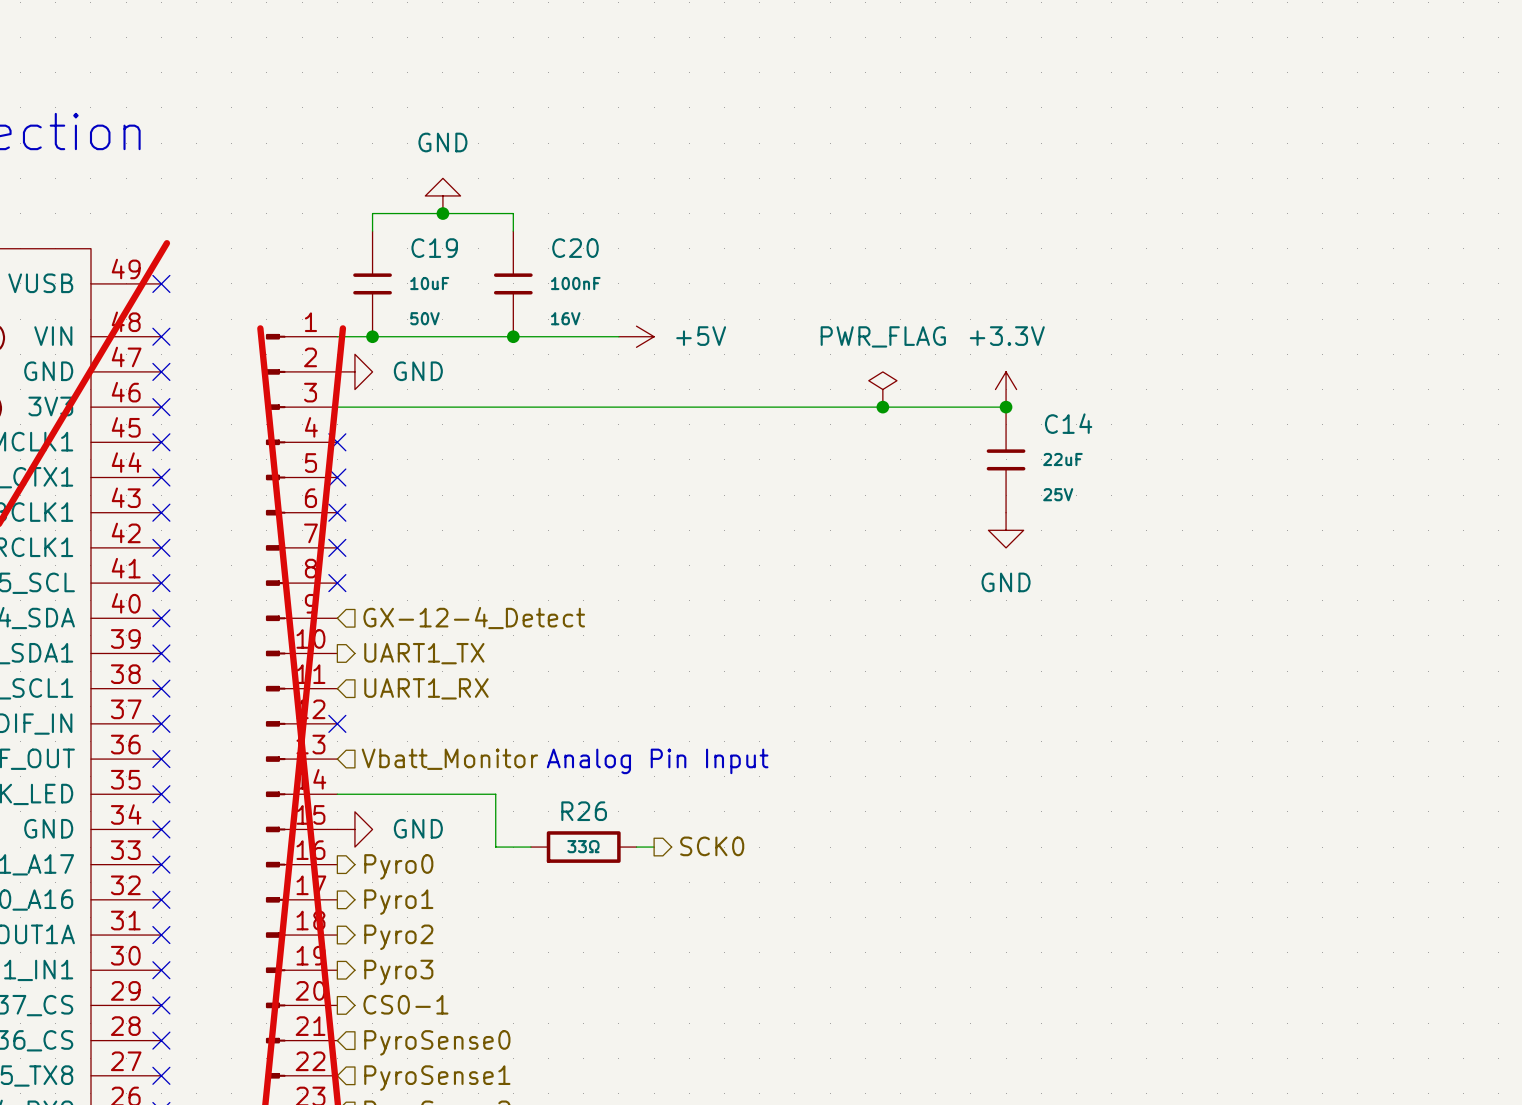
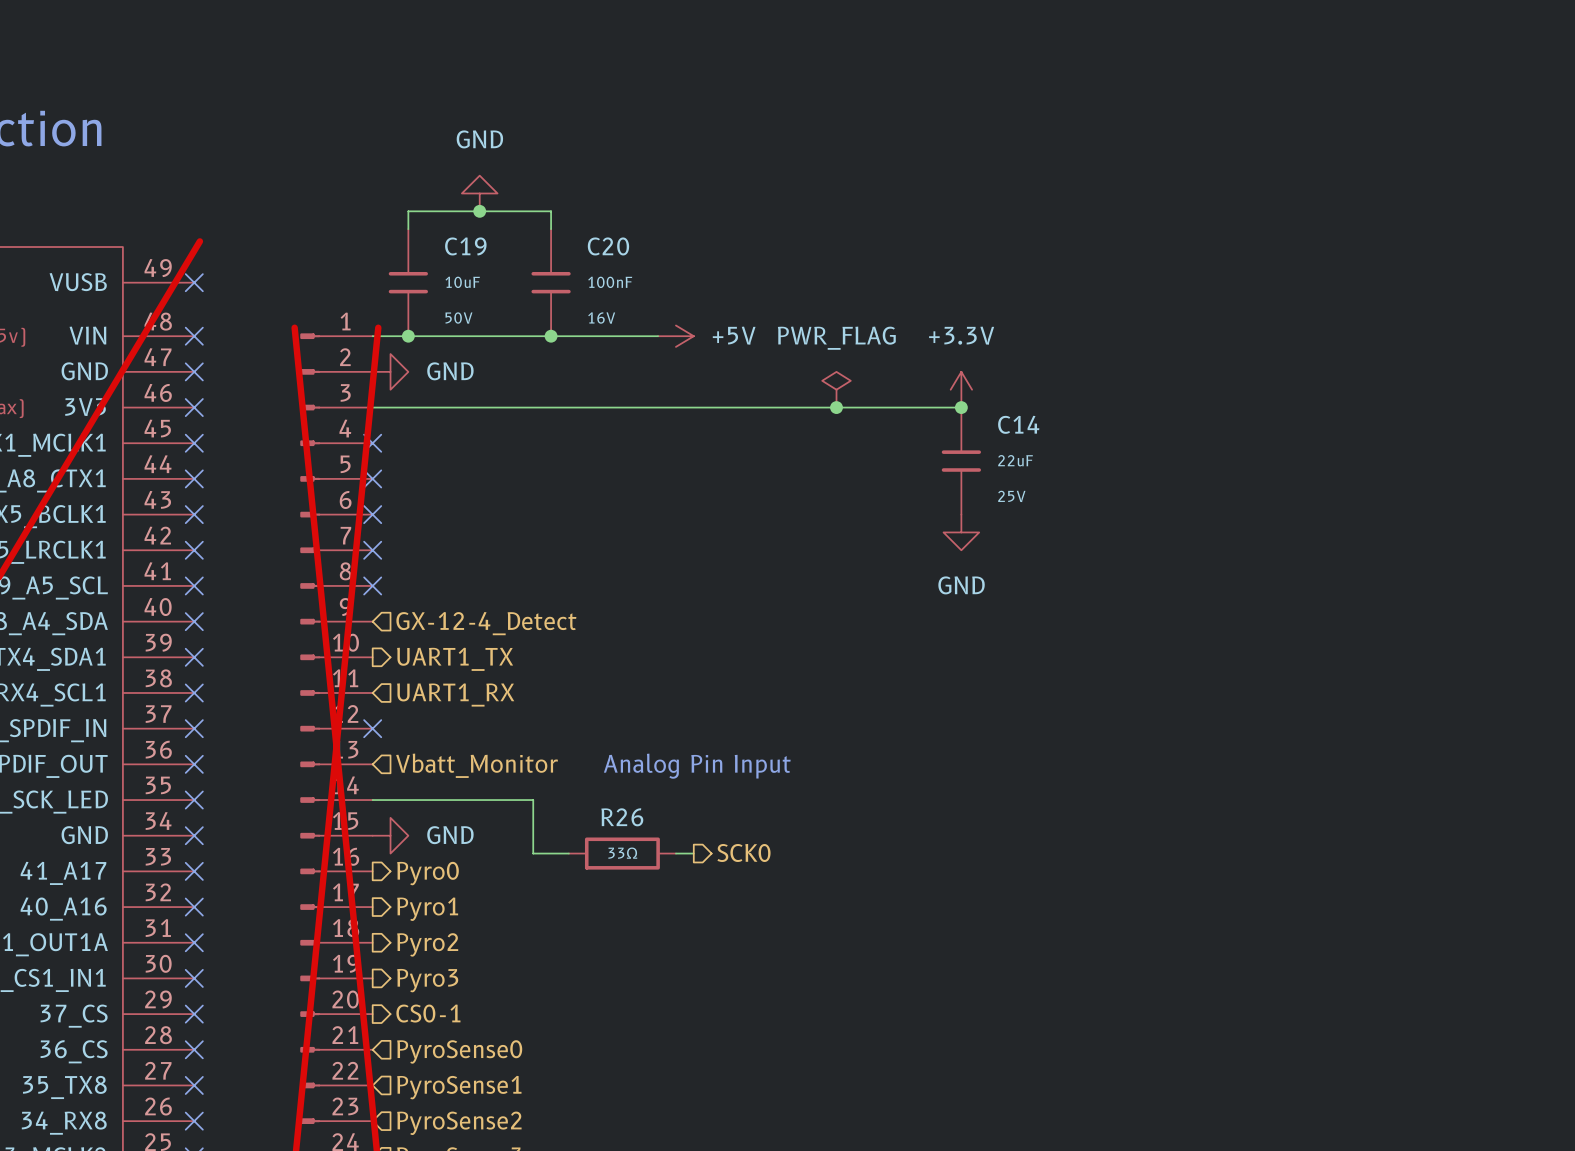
power symbol position: PWR_FLAG (882, 389) -> PWR_FLAG (836, 389)
power symbol position: +3.3V (1006, 389) -> +3.3V (961, 389)
junction: none -> (836, 407)
junction position: (882, 407) -> (961, 407)
wire: (918, 407) (1006, 407) -> none
junction: (1006, 407) -> none
C14 position: (1006, 459) -> (961, 461)
power symbol position: GND (1006, 530) -> GND (961, 532)

